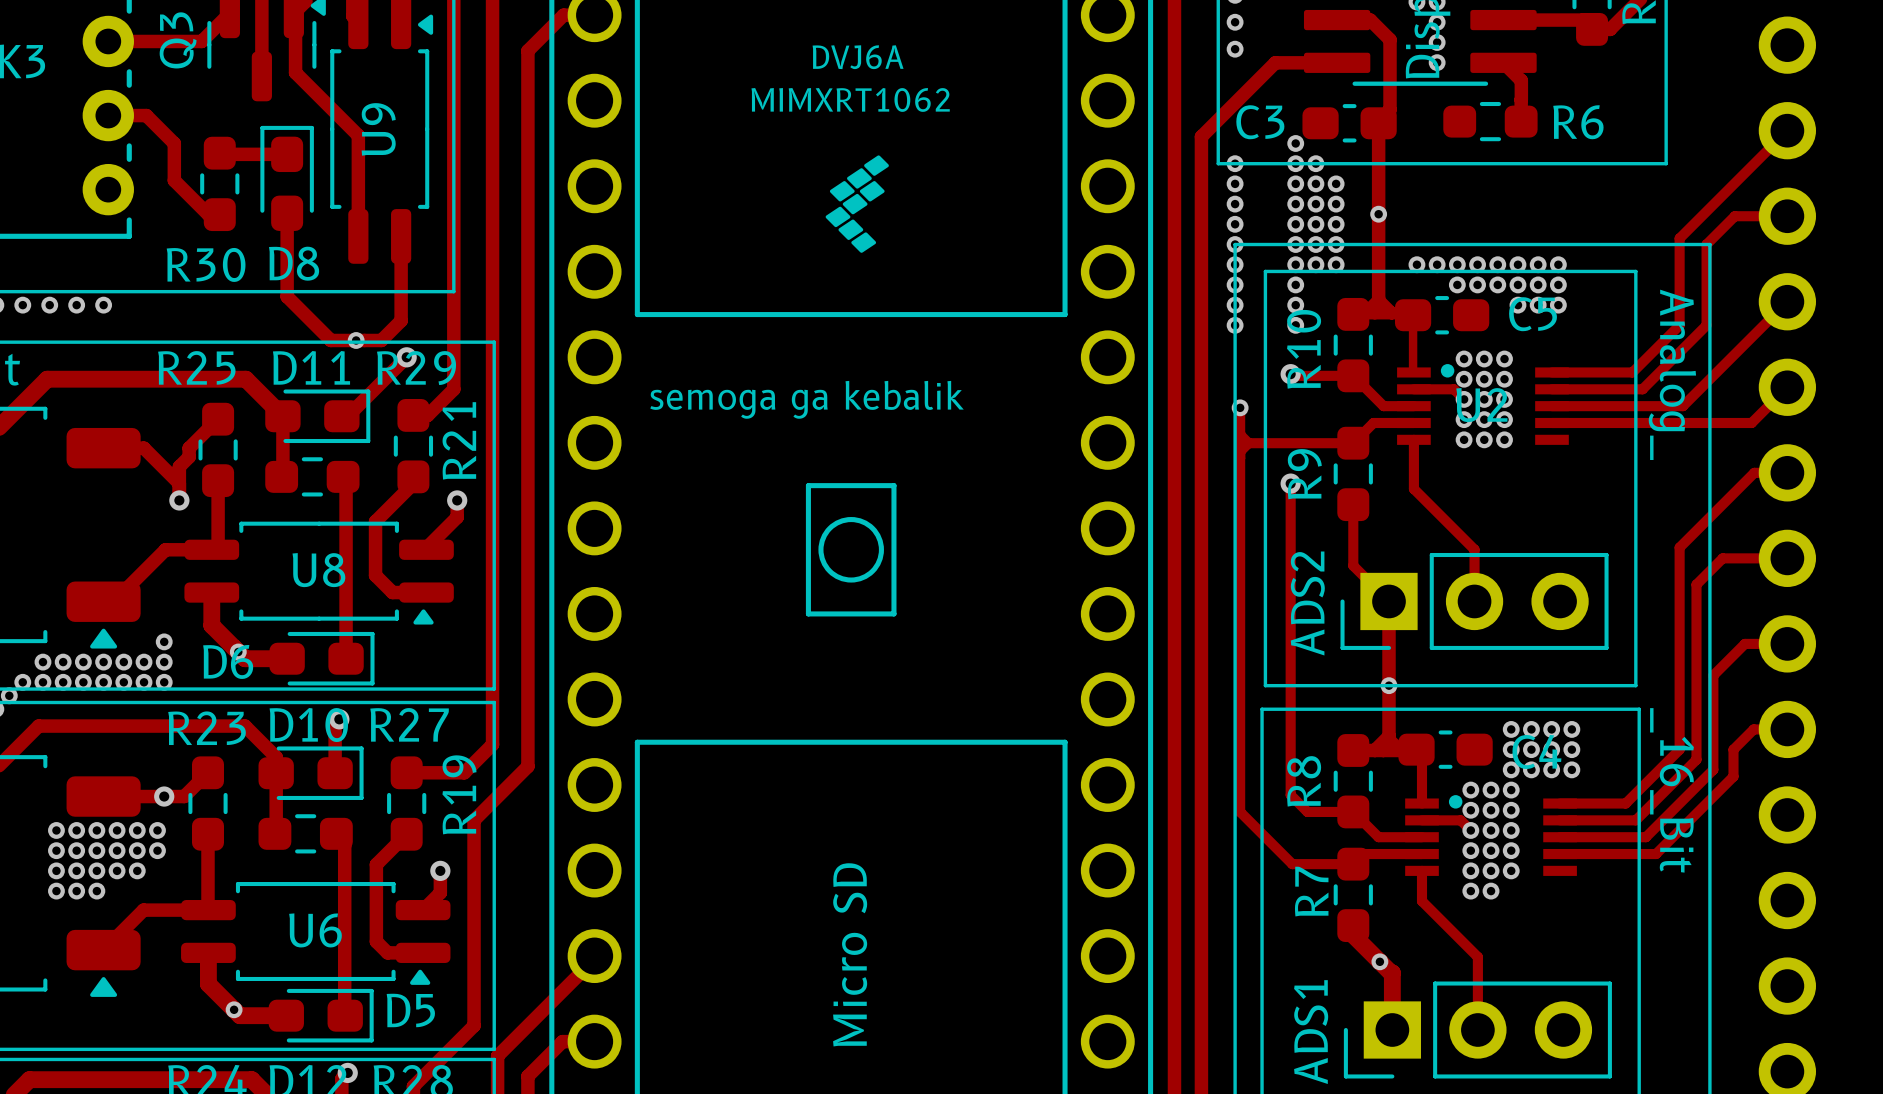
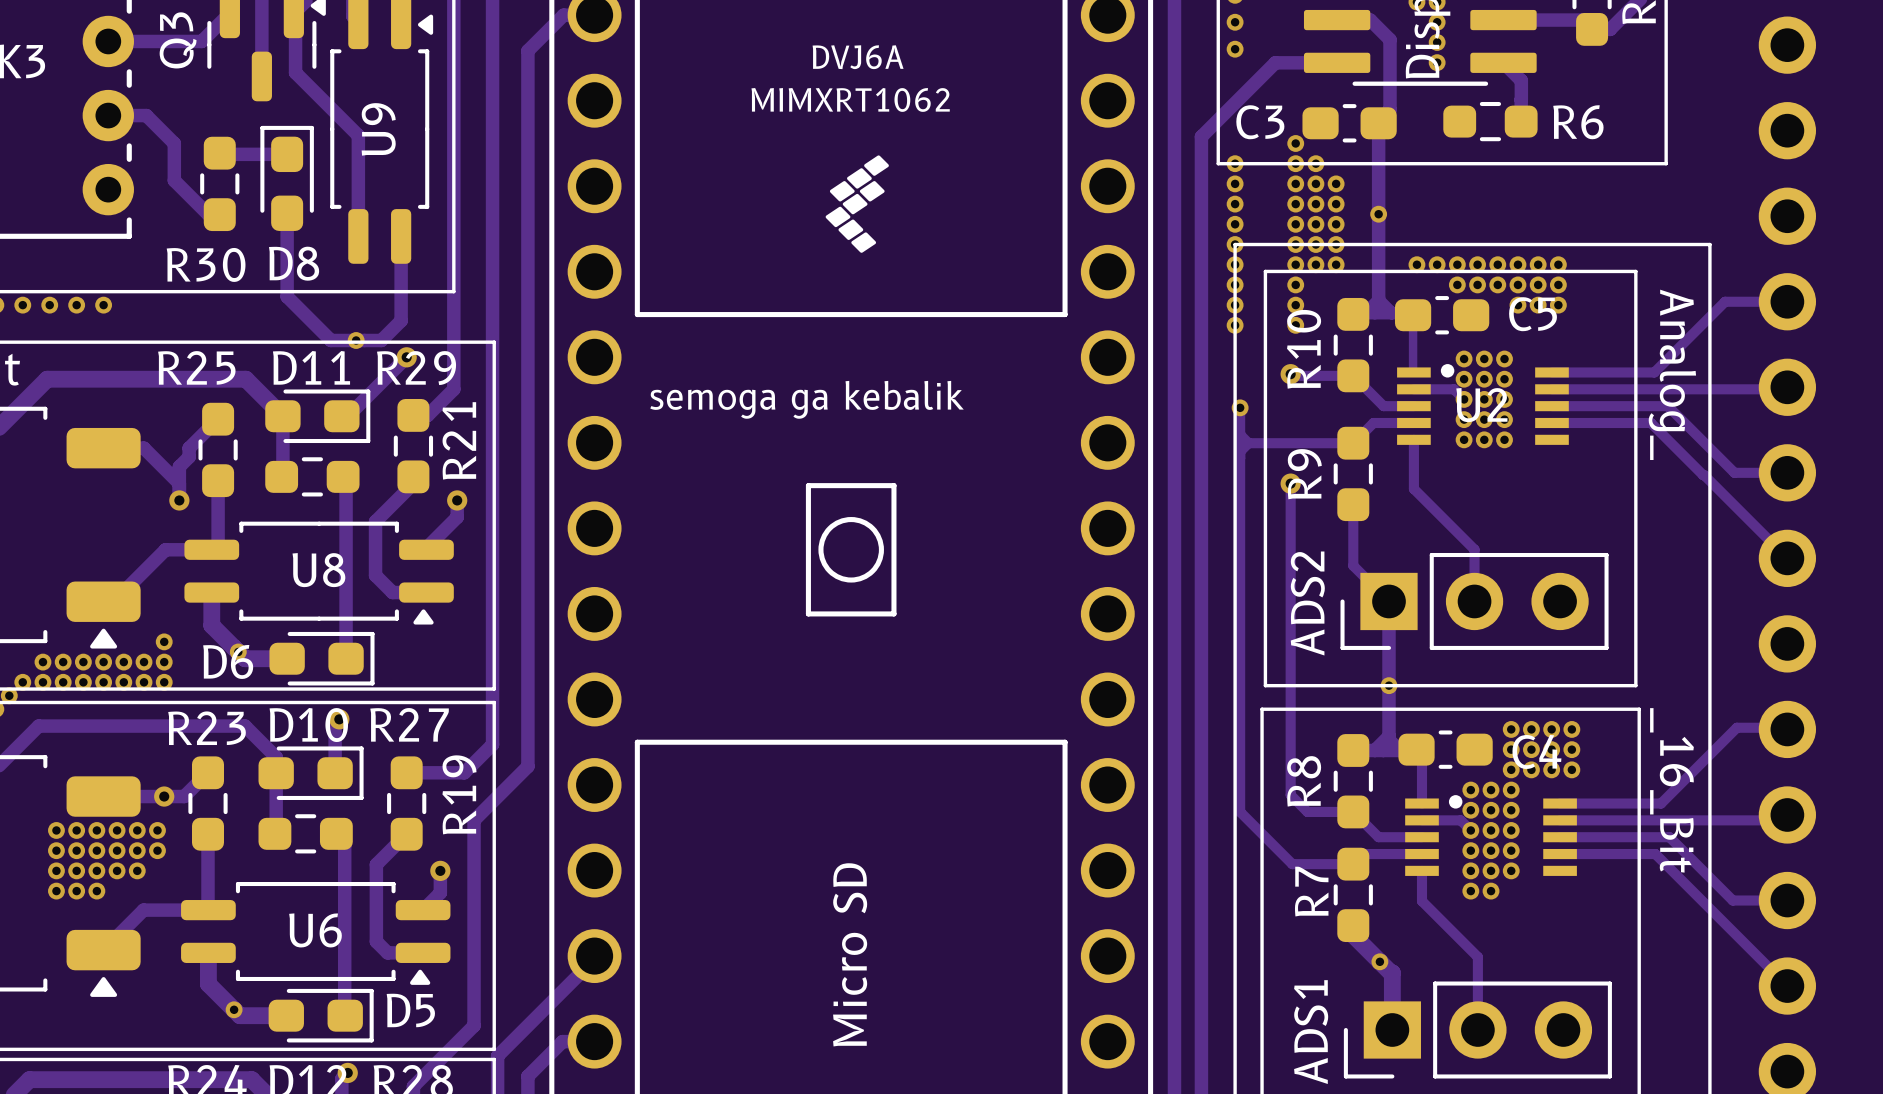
track: (1787, 130) (1679, 238) (1679, 325) (1632, 372) -> none
track: (1787, 216) (1734, 216) (1706, 244) (1706, 325) (1642, 389) -> none
track: (1787, 301) (1682, 406) (1667, 406) -> (1787, 301) (1725, 301) (1654, 372) (1632, 372)
track: (1785, 389) (1751, 422) (1650, 422) -> (1785, 389) (1642, 389)
track: none -> (1667, 406) (1734, 472) (1754, 472)
track: none -> (1650, 422) (1779, 550)
track: (1754, 472) (1679, 547) (1679, 749) (1625, 803) -> (1785, 727) (1736, 727) (1661, 803) (1625, 803)
track: (1787, 558) (1722, 558) (1696, 584) (1696, 759) (1635, 820) -> (1781, 820) (1635, 820)
track: (1787, 643) (1744, 643) (1713, 675) (1713, 769) (1645, 837) -> (1787, 900) (1732, 900) (1669, 837) (1645, 837)
track: (1787, 729) (1753, 729) (1733, 749) (1733, 776) (1656, 854) -> (1787, 986) (1655, 854)

